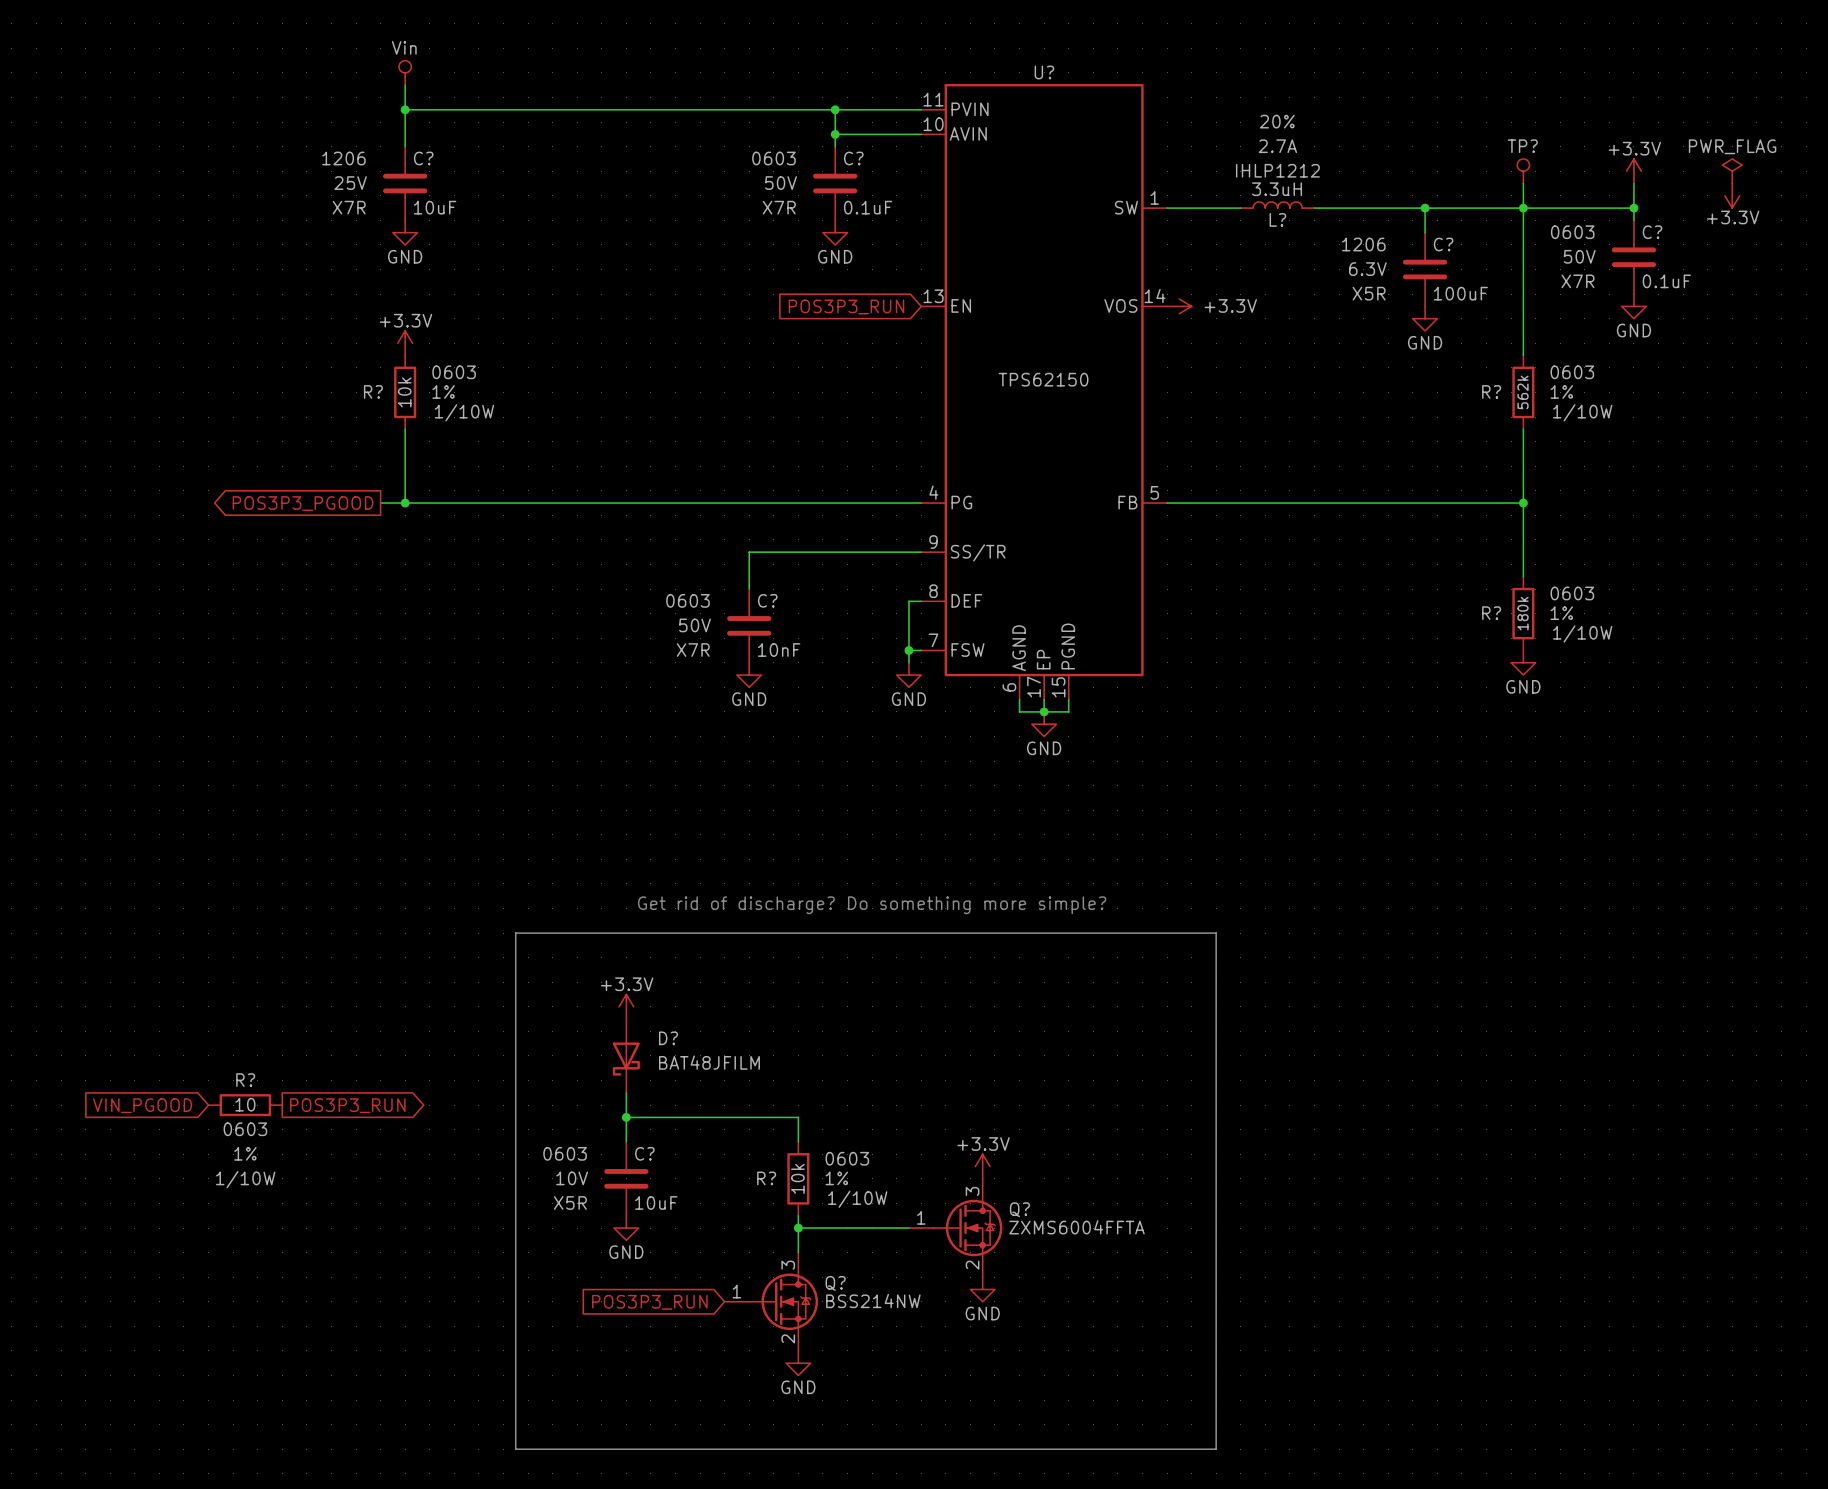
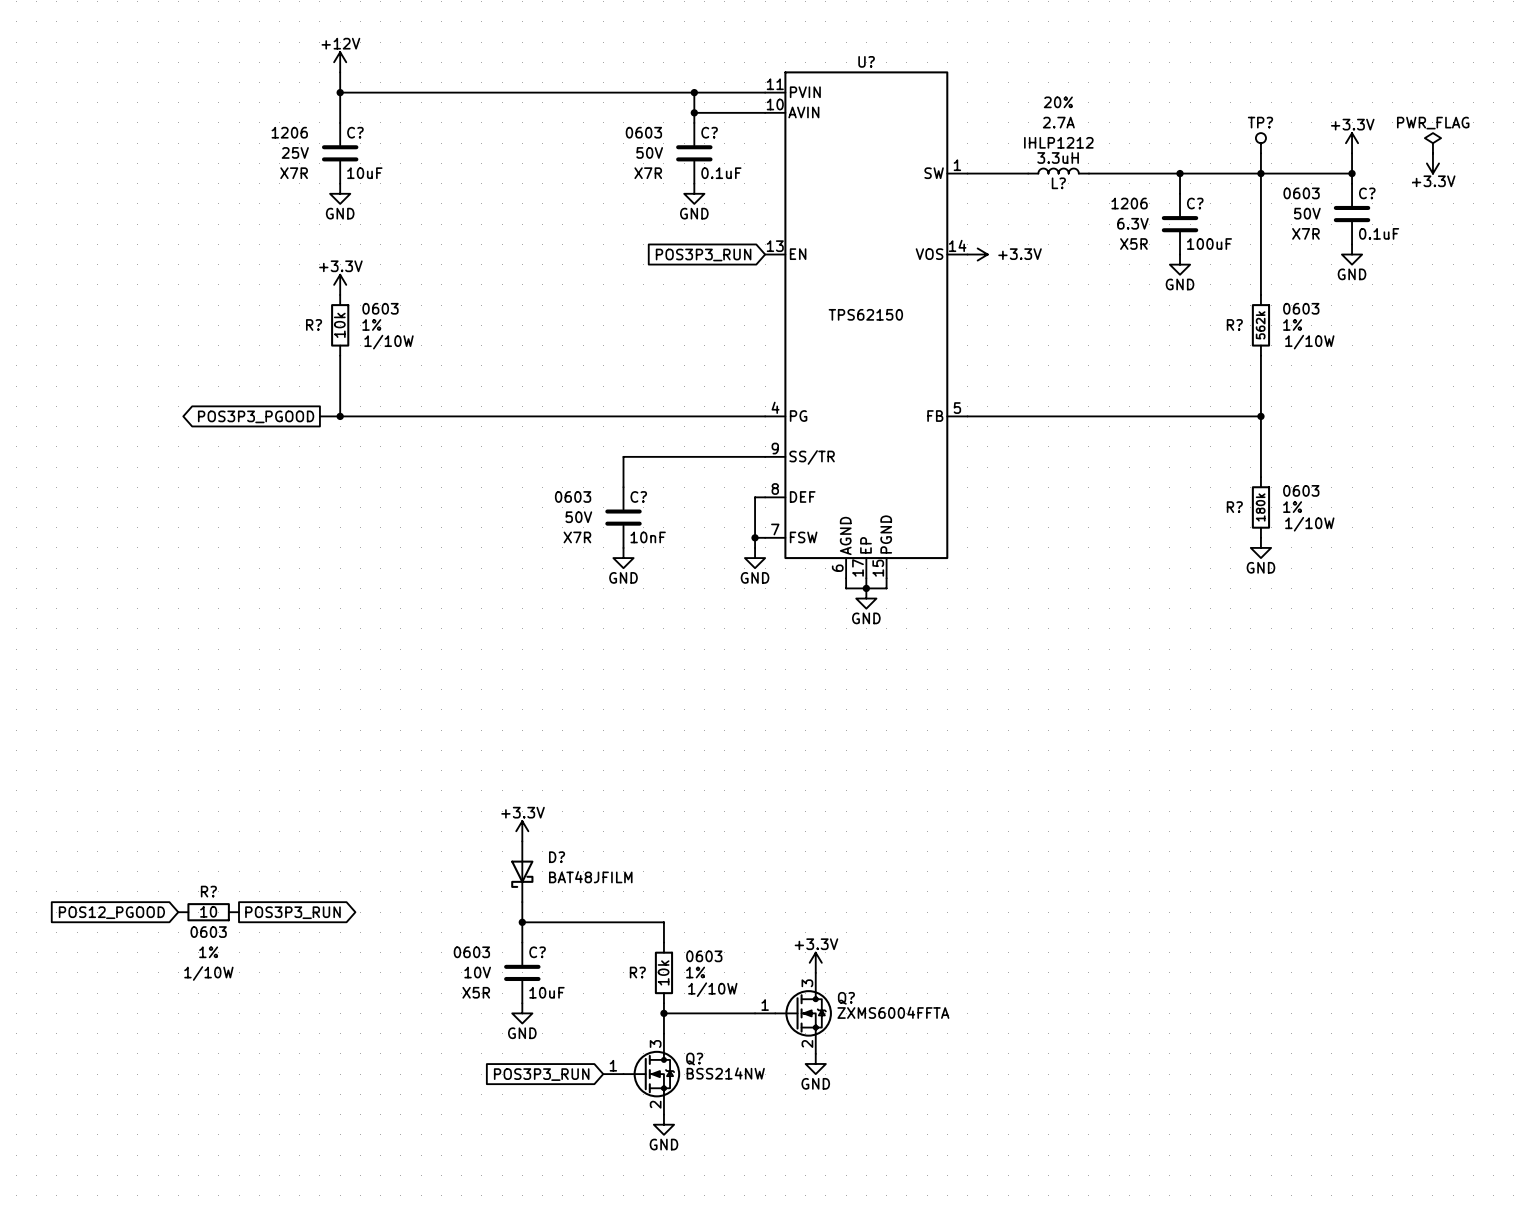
power symbol: Vin (405, 72) -> +12V (340, 62)
text: Get rid of discharge? Do something more simple? (872, 905) -> none
line: (515, 933) (1216, 933) (1216, 1449) (515, 1449) (515, 933) -> none
global label: VIN_PGOOD (142, 1105) -> POS12_PGOOD (111, 912)

